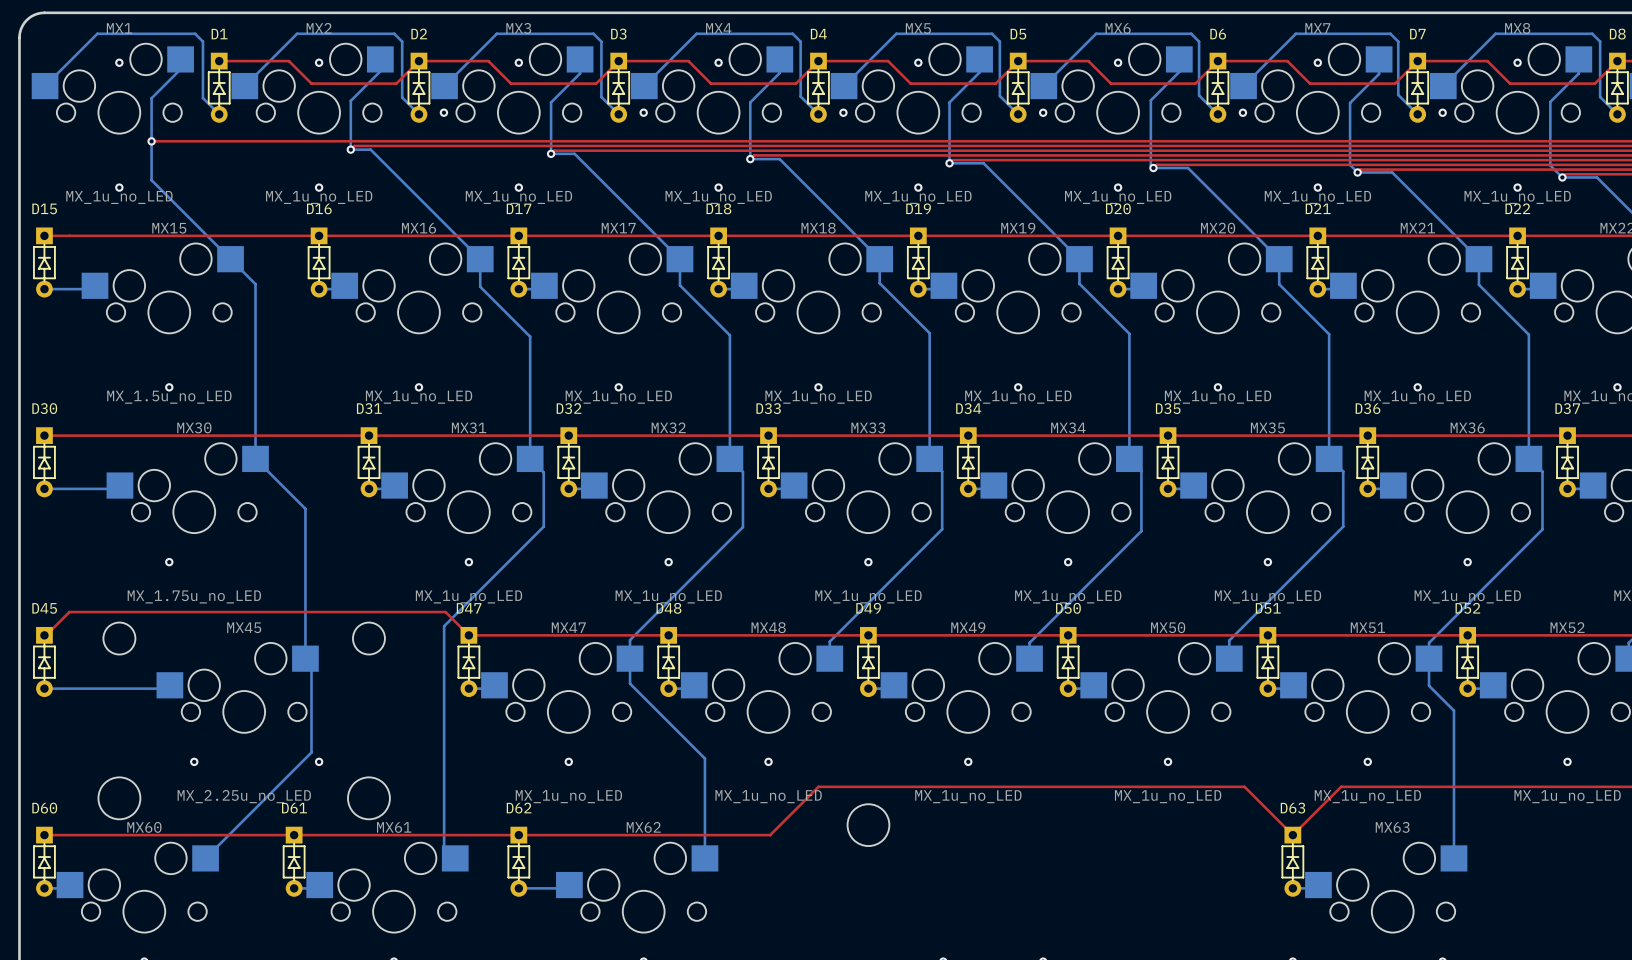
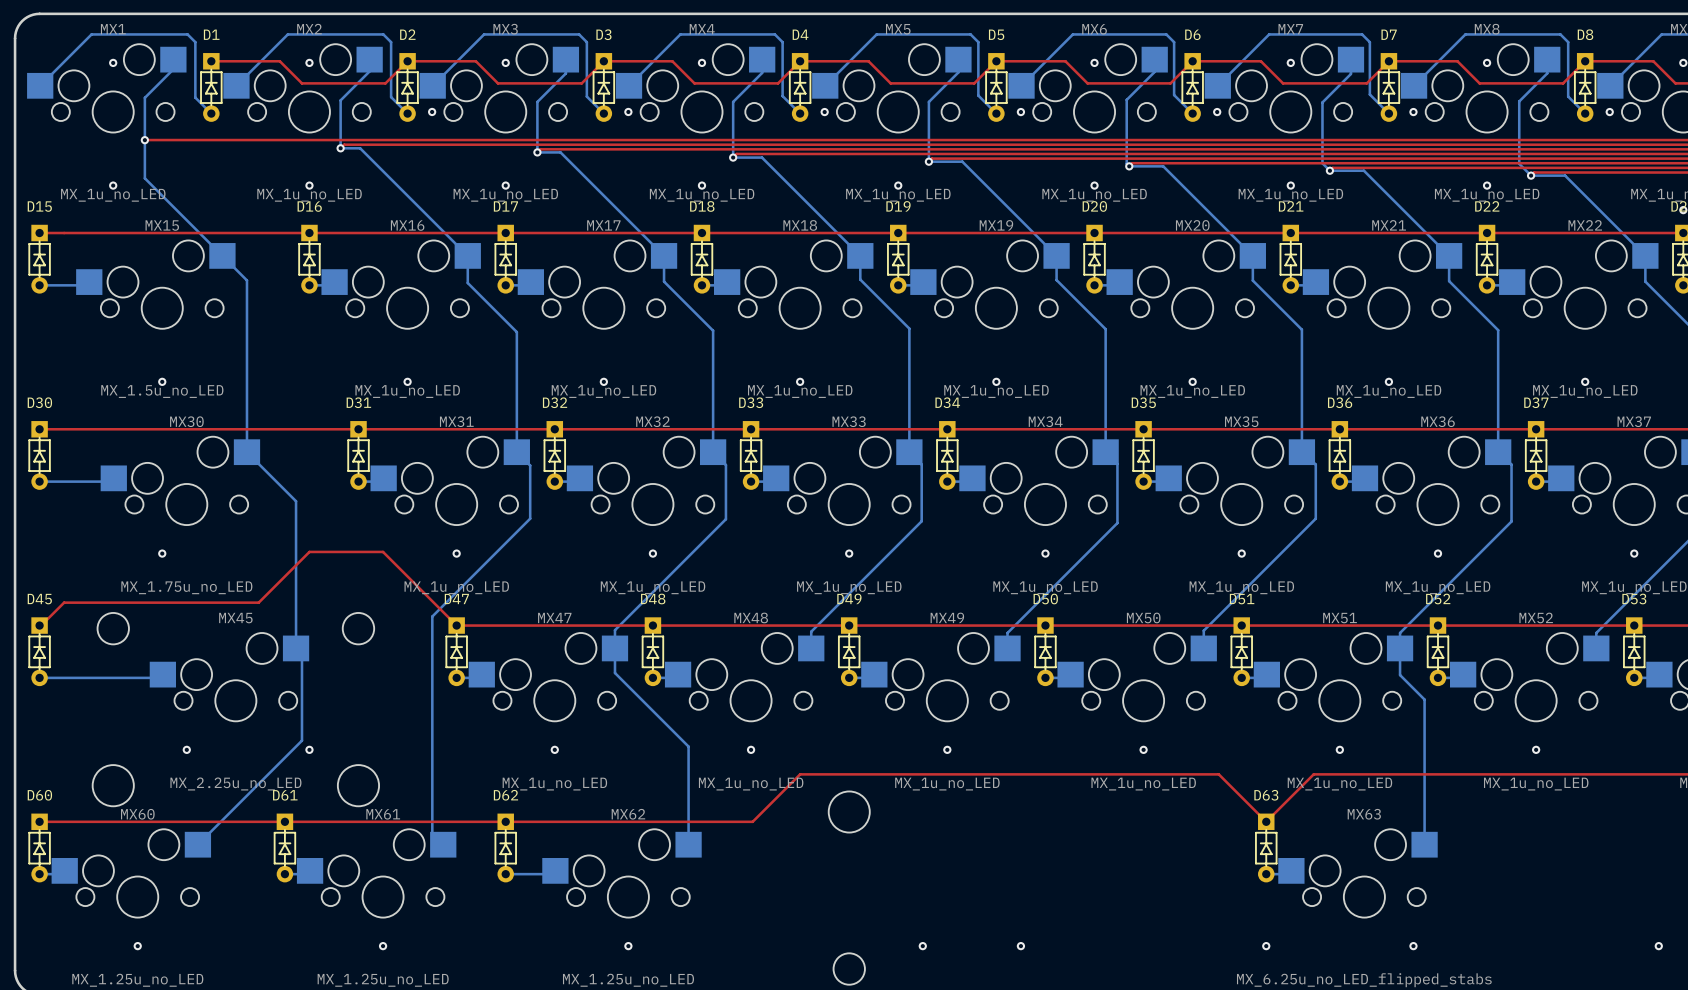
via: (918, 62) -> none
top track: (267, 612) (445, 612) -> (258, 602) (309, 551) (383, 551) (433, 602)

